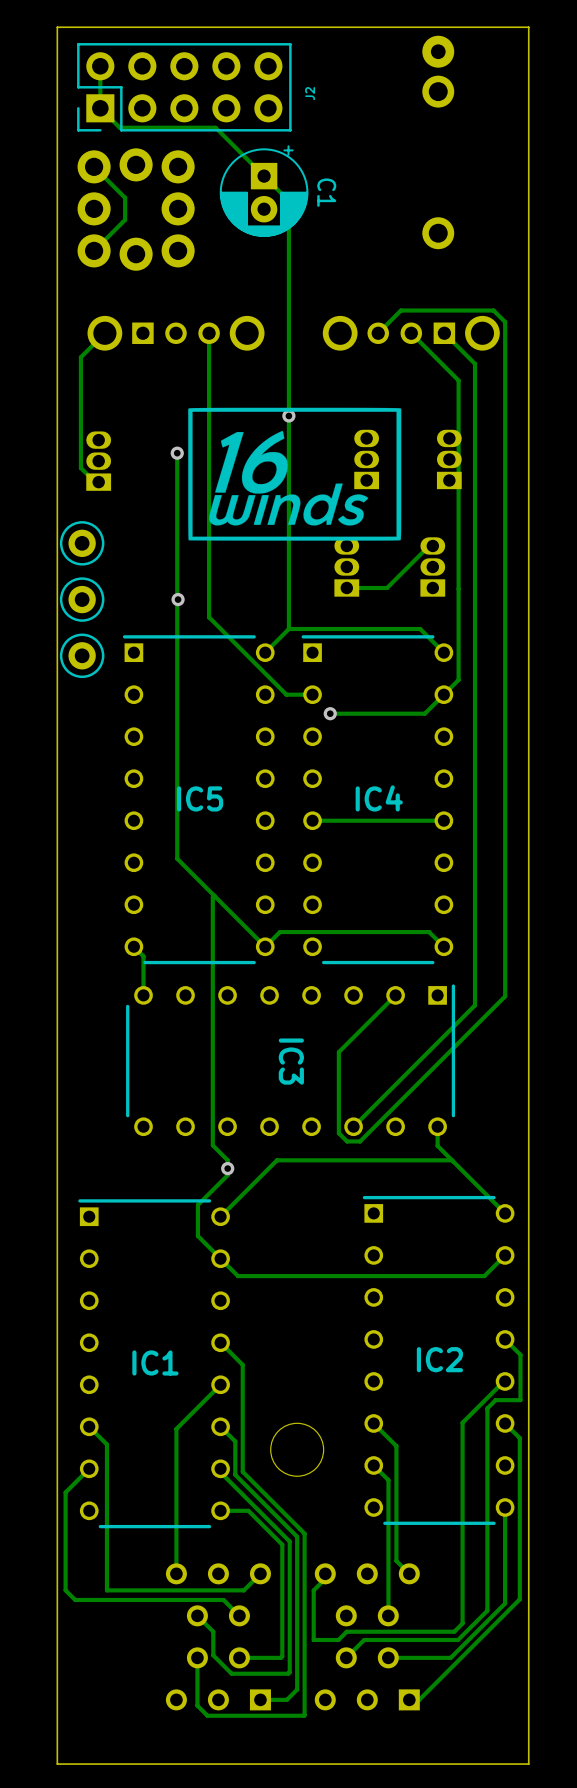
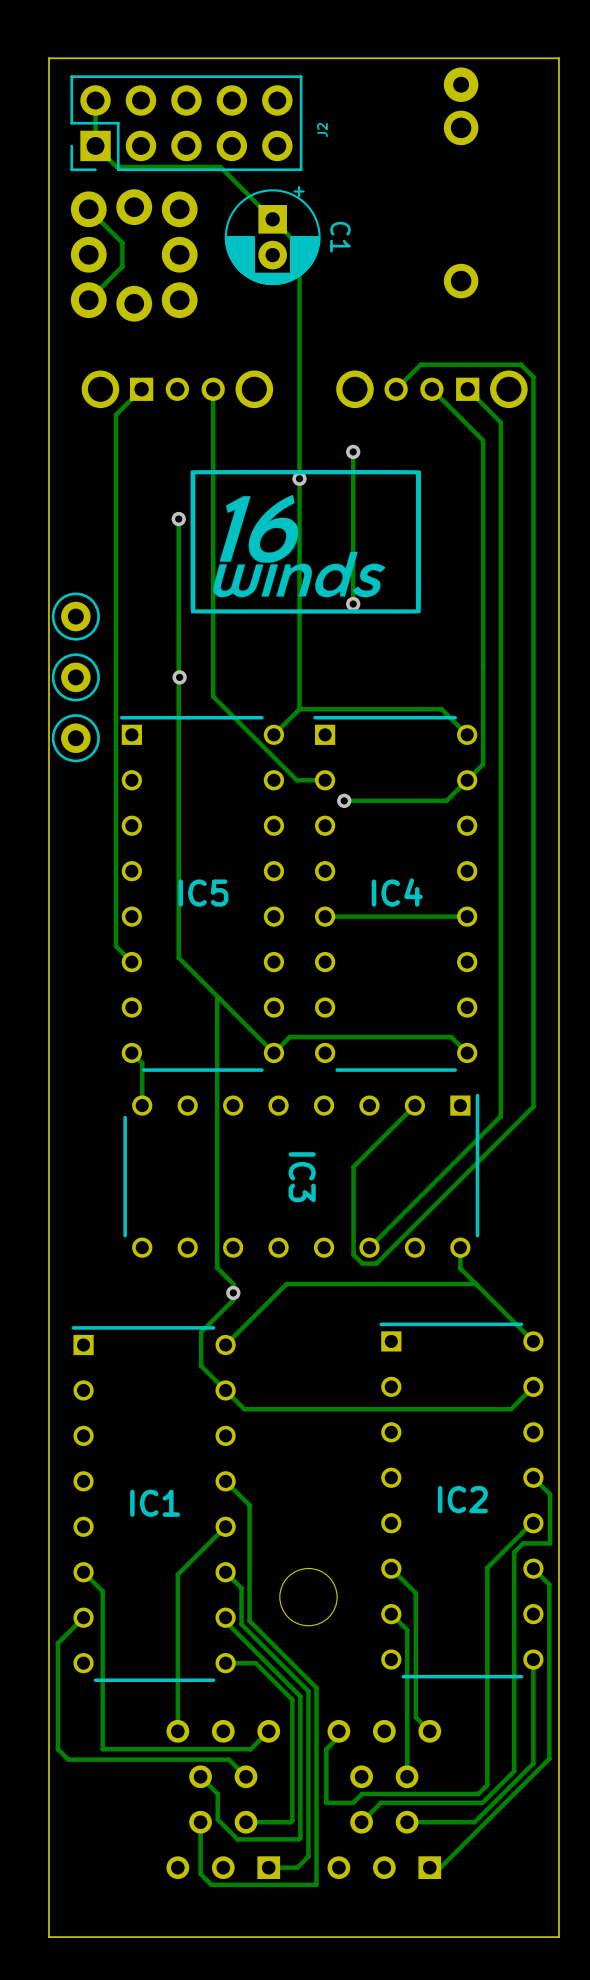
track: (104, 333) (80, 357) (80, 468) (94, 482) (98, 482) -> none
track: none -> (141, 389) (115, 414) (115, 946) (131, 962)
track: none -> (353, 451) (353, 604)
via: none -> (353, 451)
part: (366, 459) -> none
part: (449, 459) -> none
part: (98, 461) -> none
via: none -> (353, 604)
track: (432, 545) (429, 545) (387, 587) (346, 587) -> none
part: (346, 566) -> none
part: (432, 566) -> none

